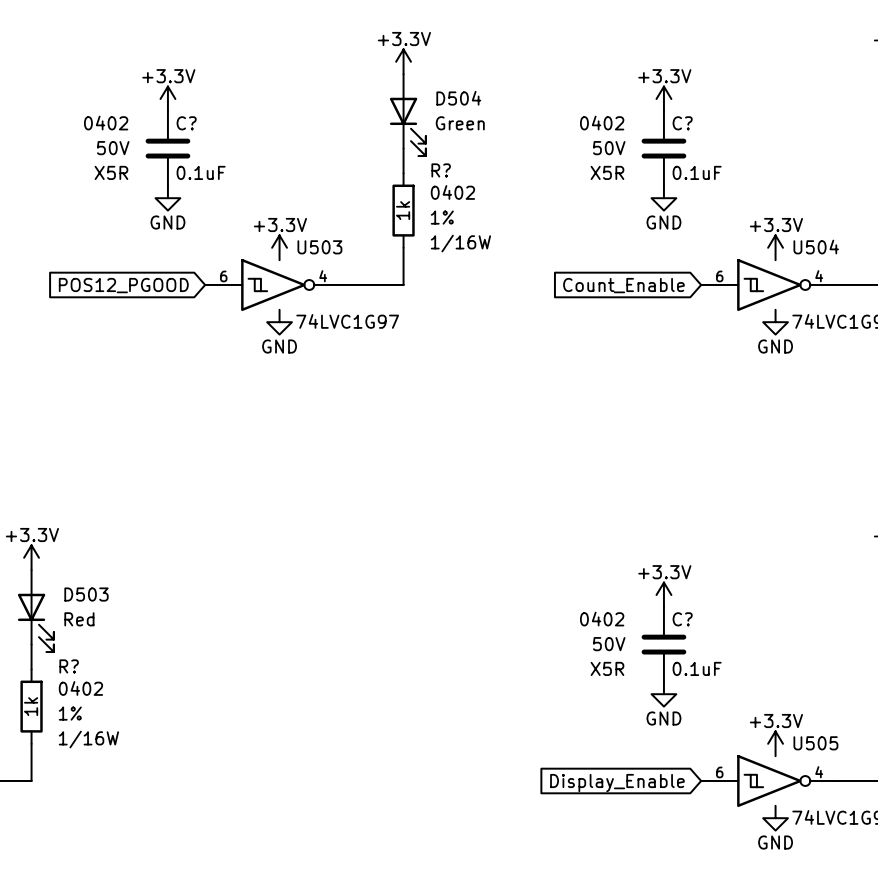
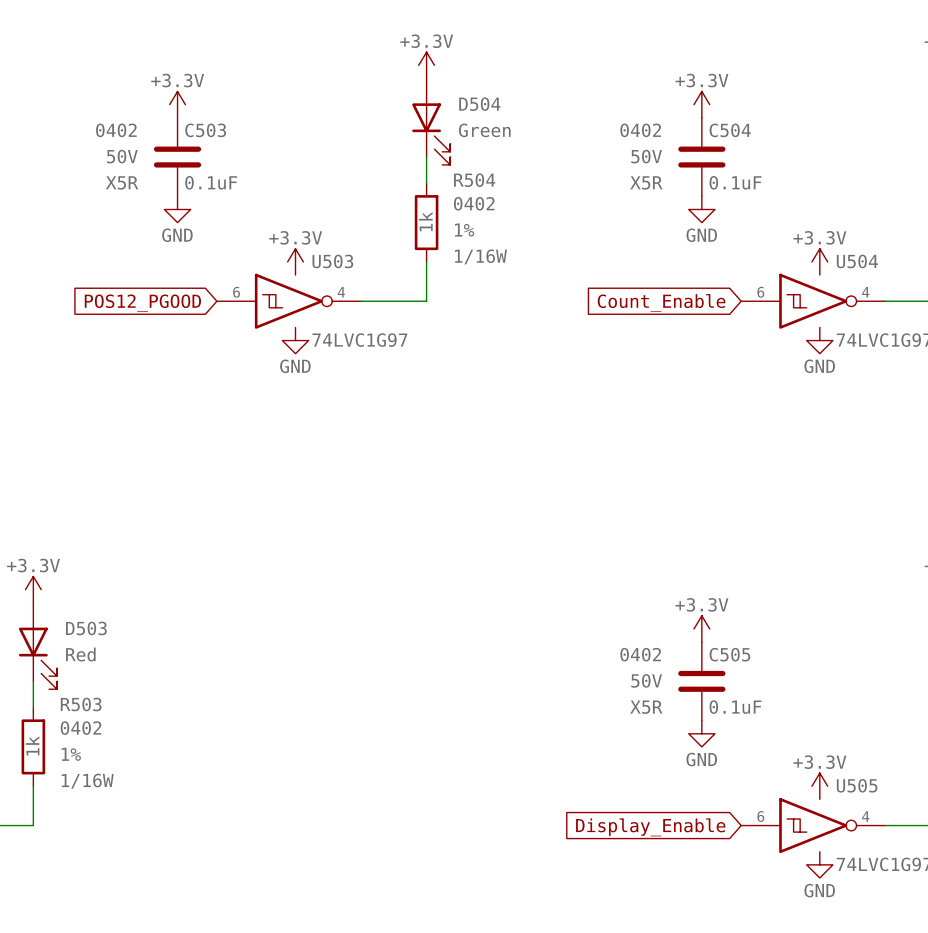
C? name: C? (186, 123) -> C503 (205, 130)
C? name: C? (682, 123) -> C504 (730, 130)
R? name: R? (441, 170) -> R504 (474, 180)
C? name: C? (682, 619) -> C505 (729, 654)
R? name: R? (69, 666) -> R503 (81, 704)

